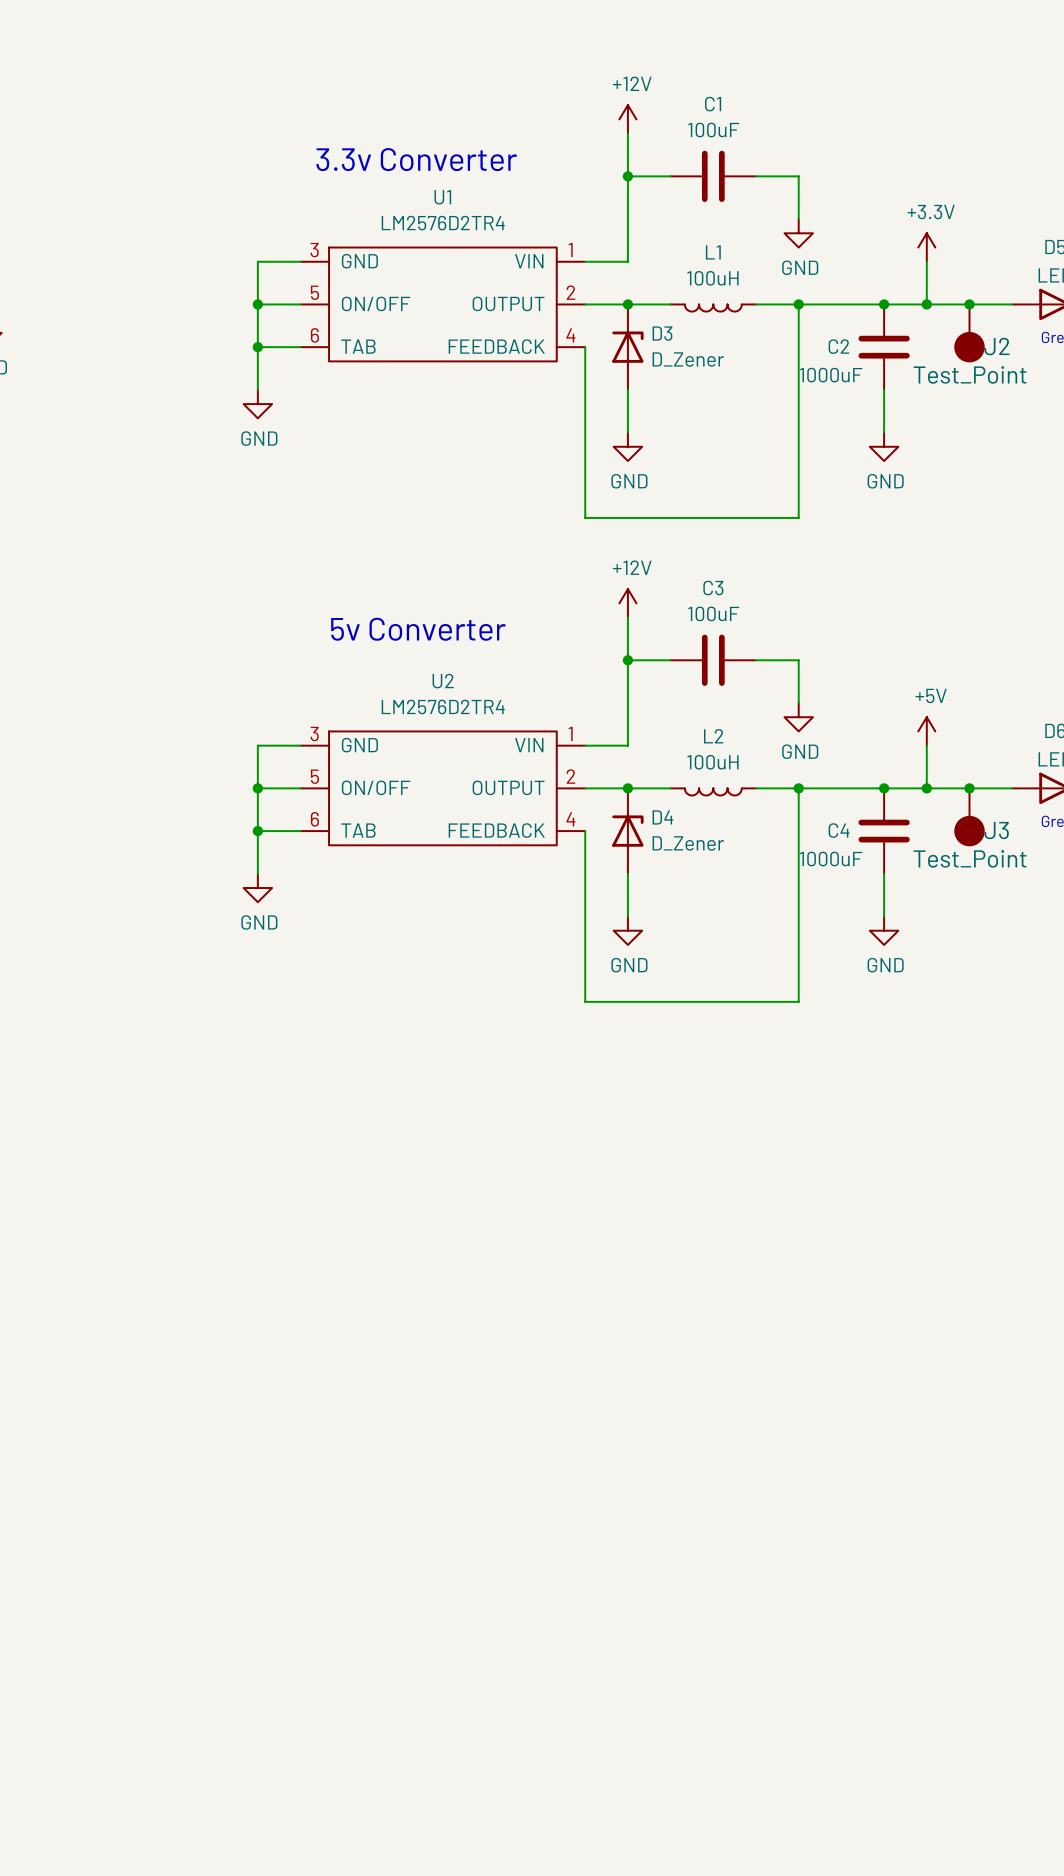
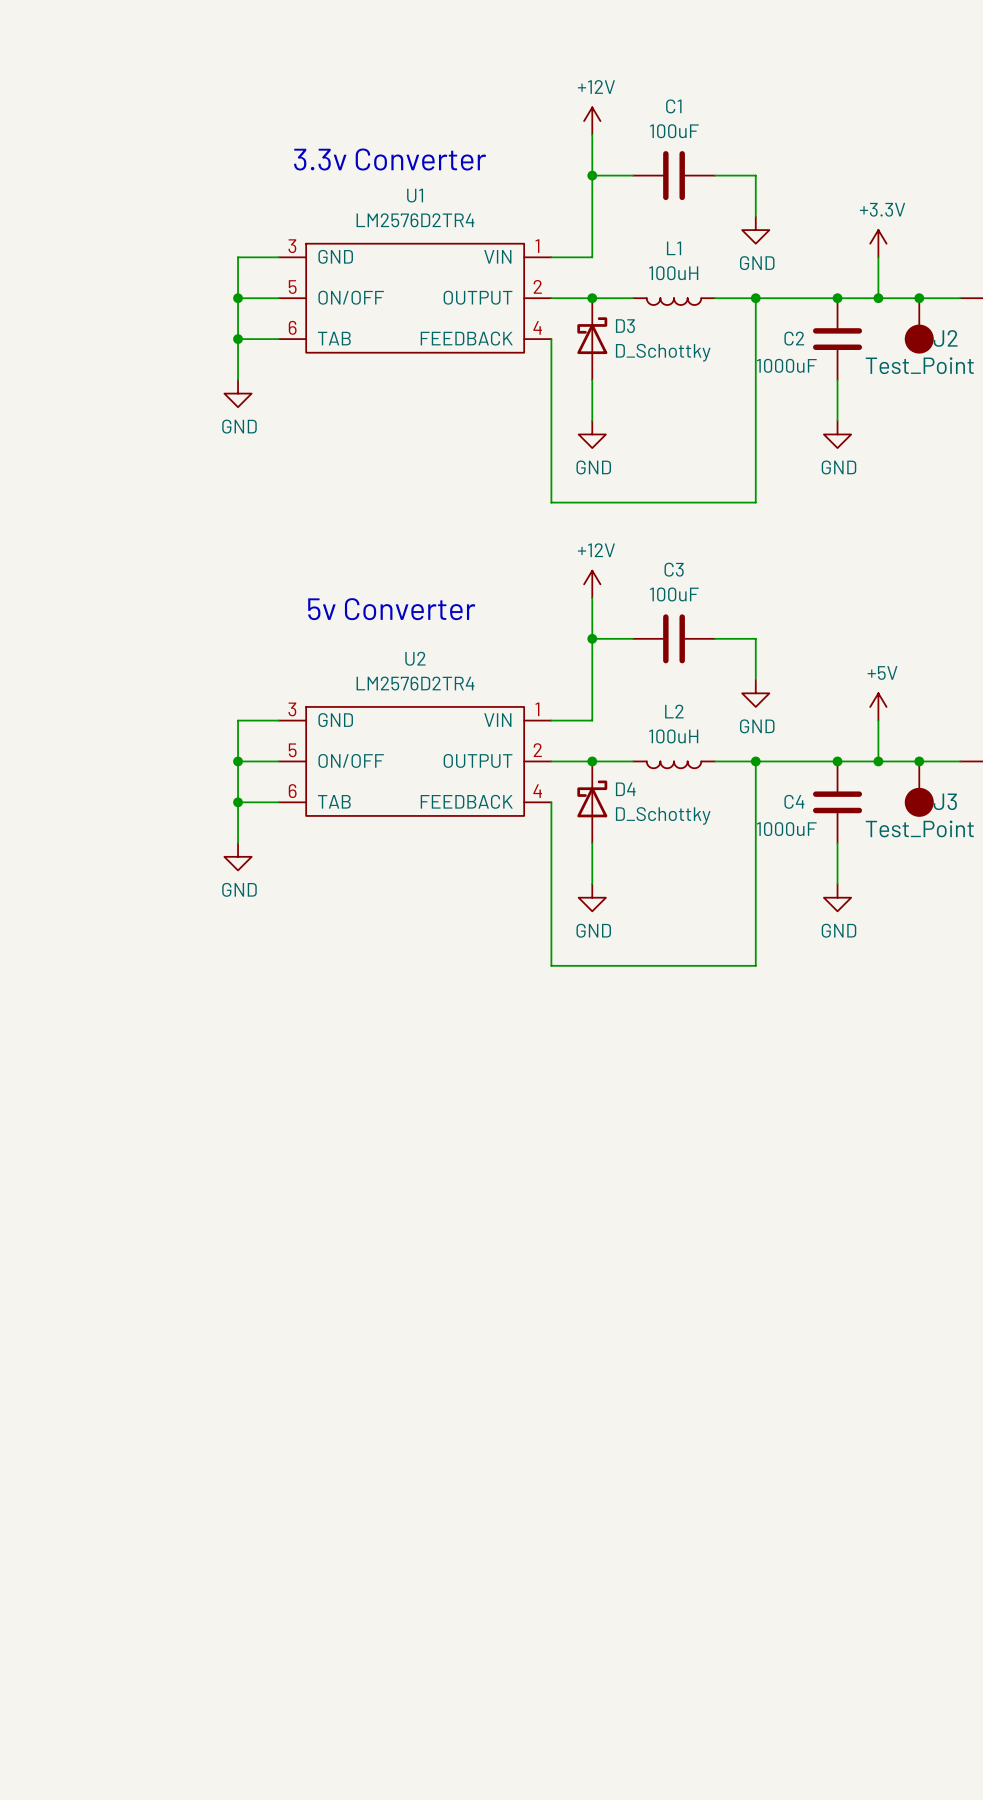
D3 symbol: [612, 304, 644, 390] -> [577, 298, 608, 380]
D3 value: D_Zener (688, 359) -> D_Schottky (663, 352)
D4 symbol: [612, 788, 644, 874] -> [577, 761, 608, 844]
D4 value: D_Zener (688, 843) -> D_Schottky (663, 815)

